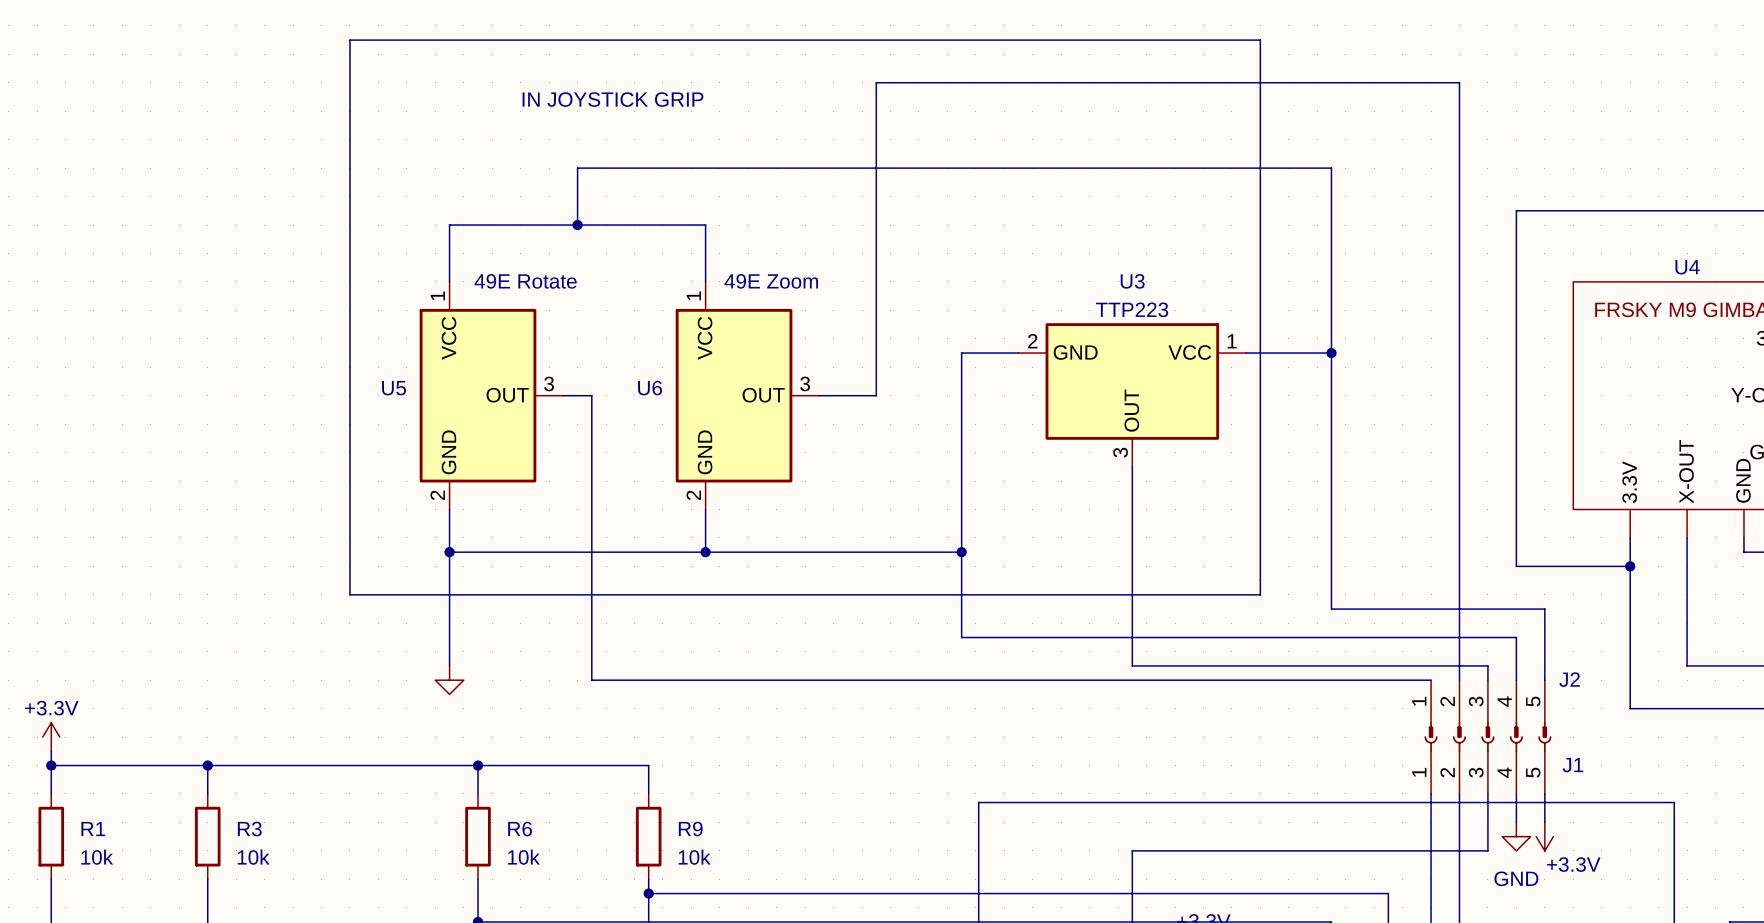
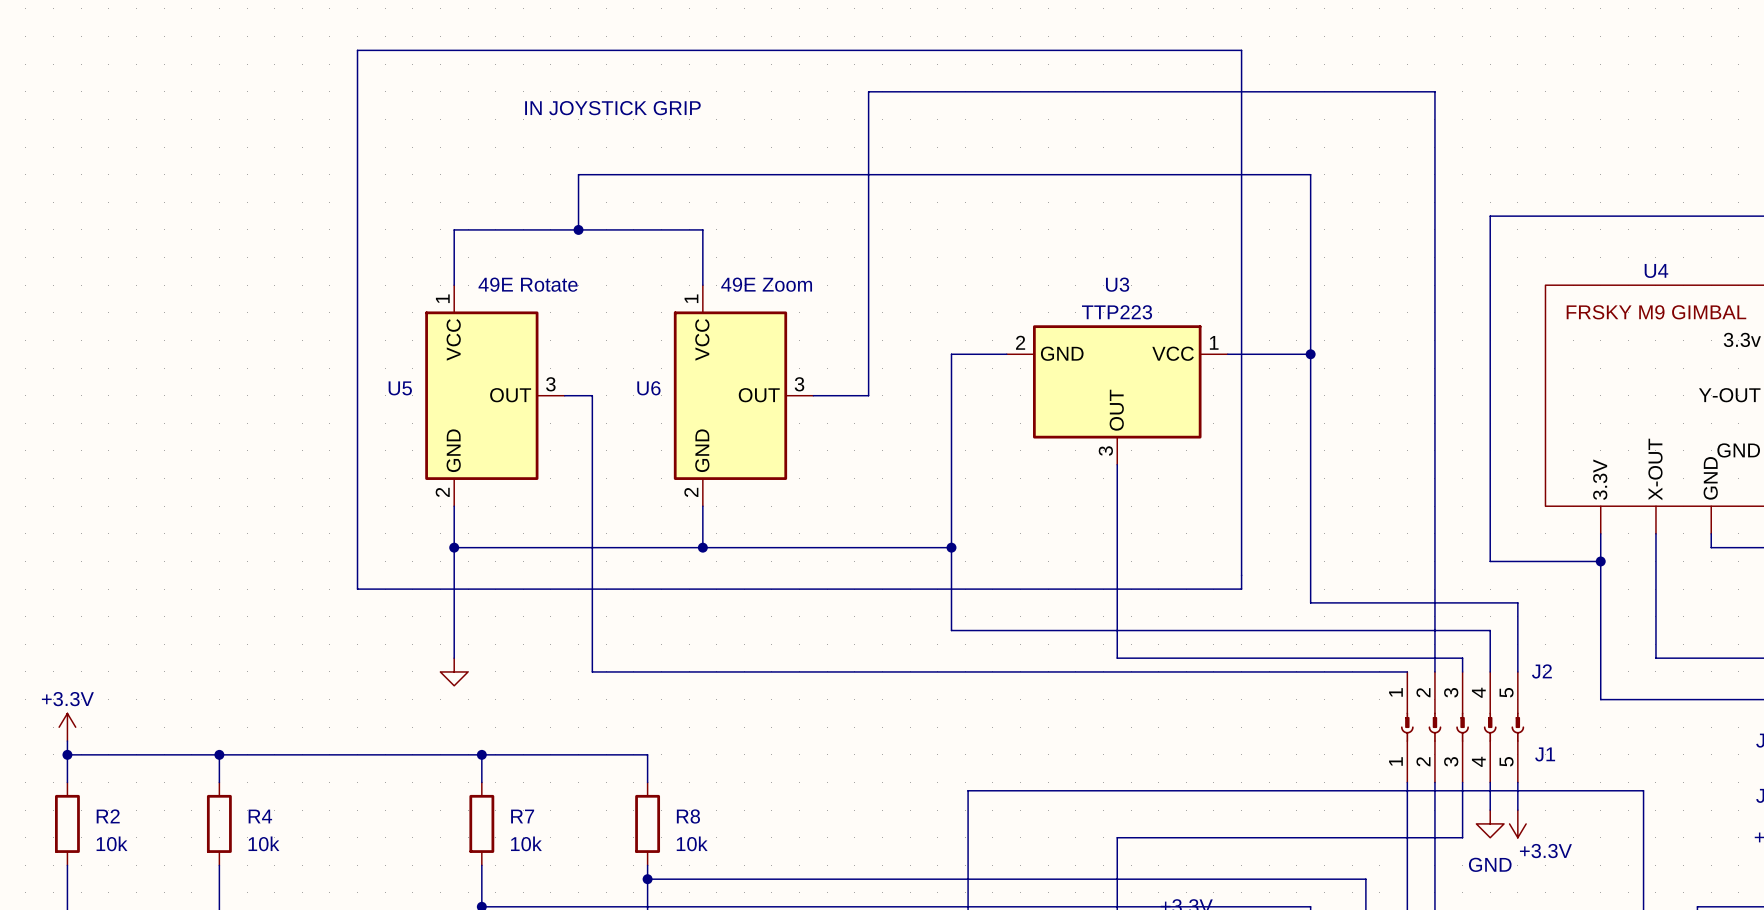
R1 name: R1 (93, 829) -> R2 (108, 816)
R3 name: R3 (249, 829) -> R4 (260, 816)
R6 name: R6 (520, 829) -> R7 (522, 816)
R9 name: R9 (690, 829) -> R8 (688, 816)

